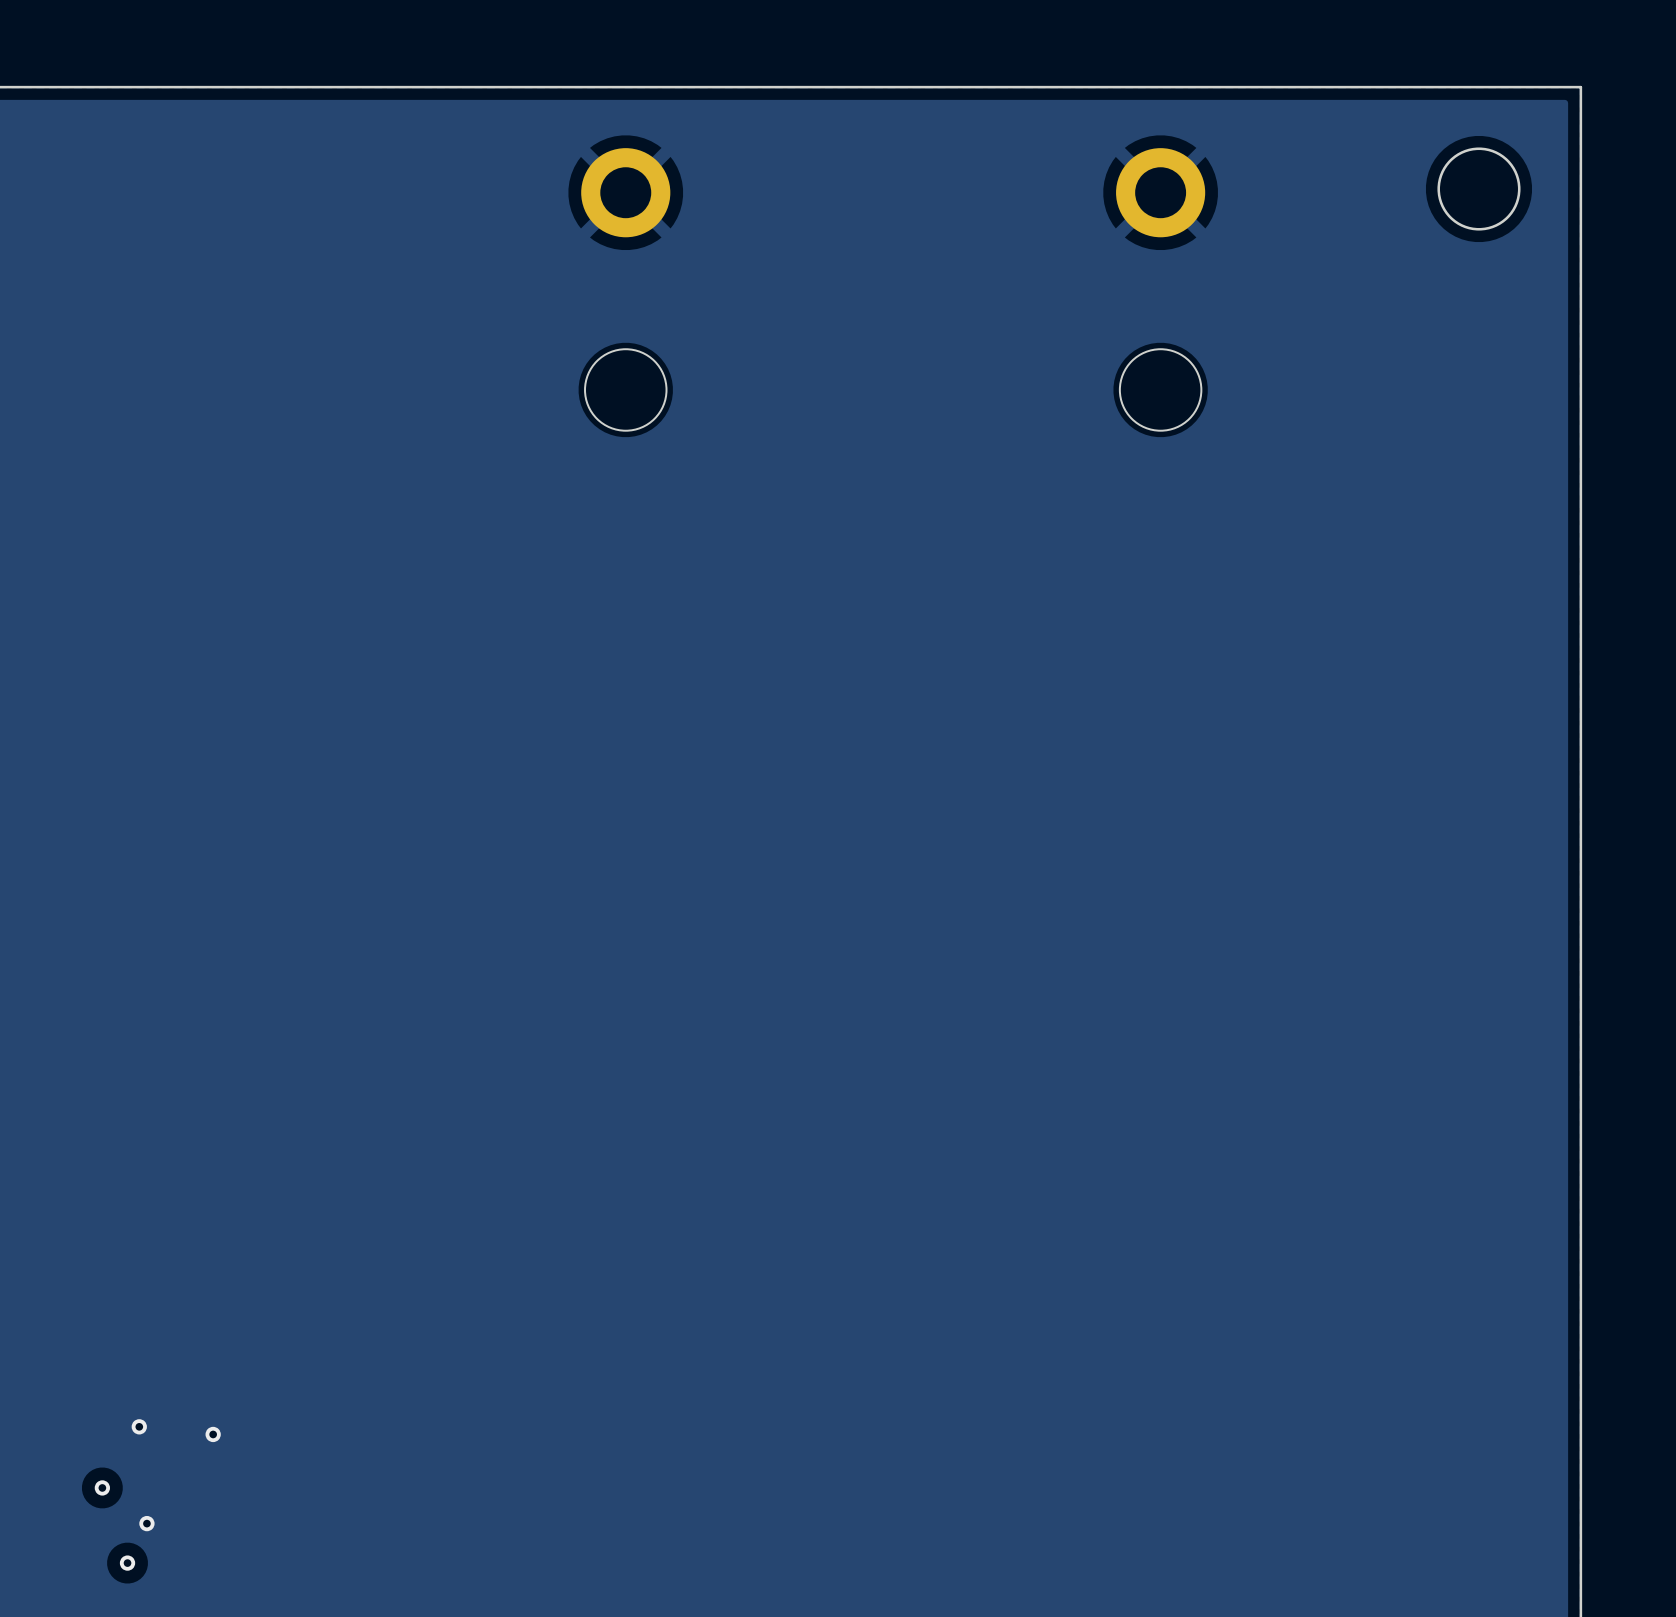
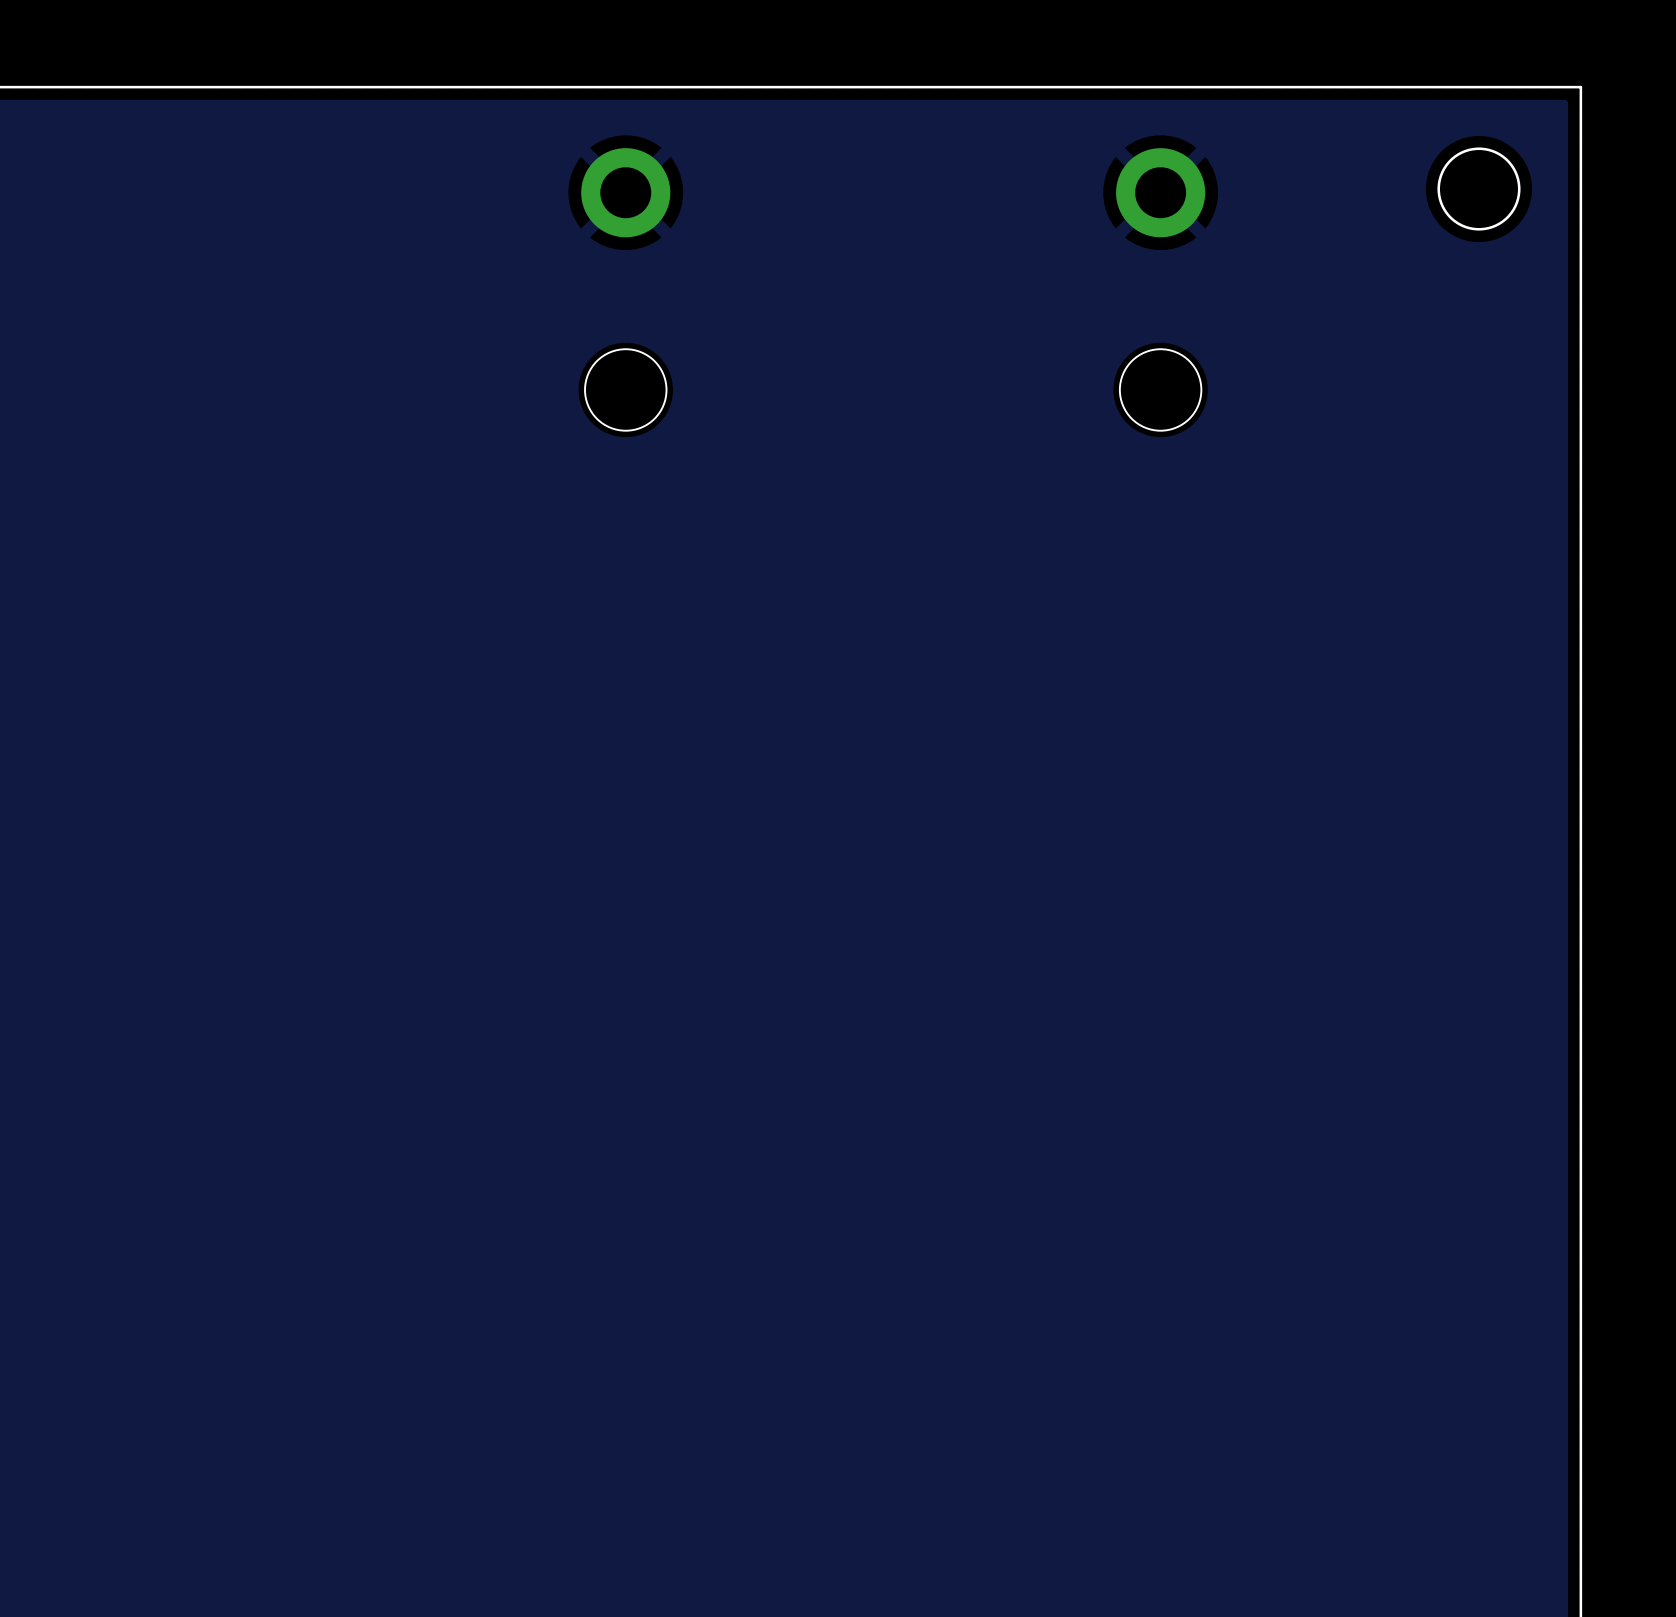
via: (139, 1426) -> none
via: (213, 1434) -> none
via: (102, 1487) -> none
via: (146, 1523) -> none
via: (127, 1563) -> none

